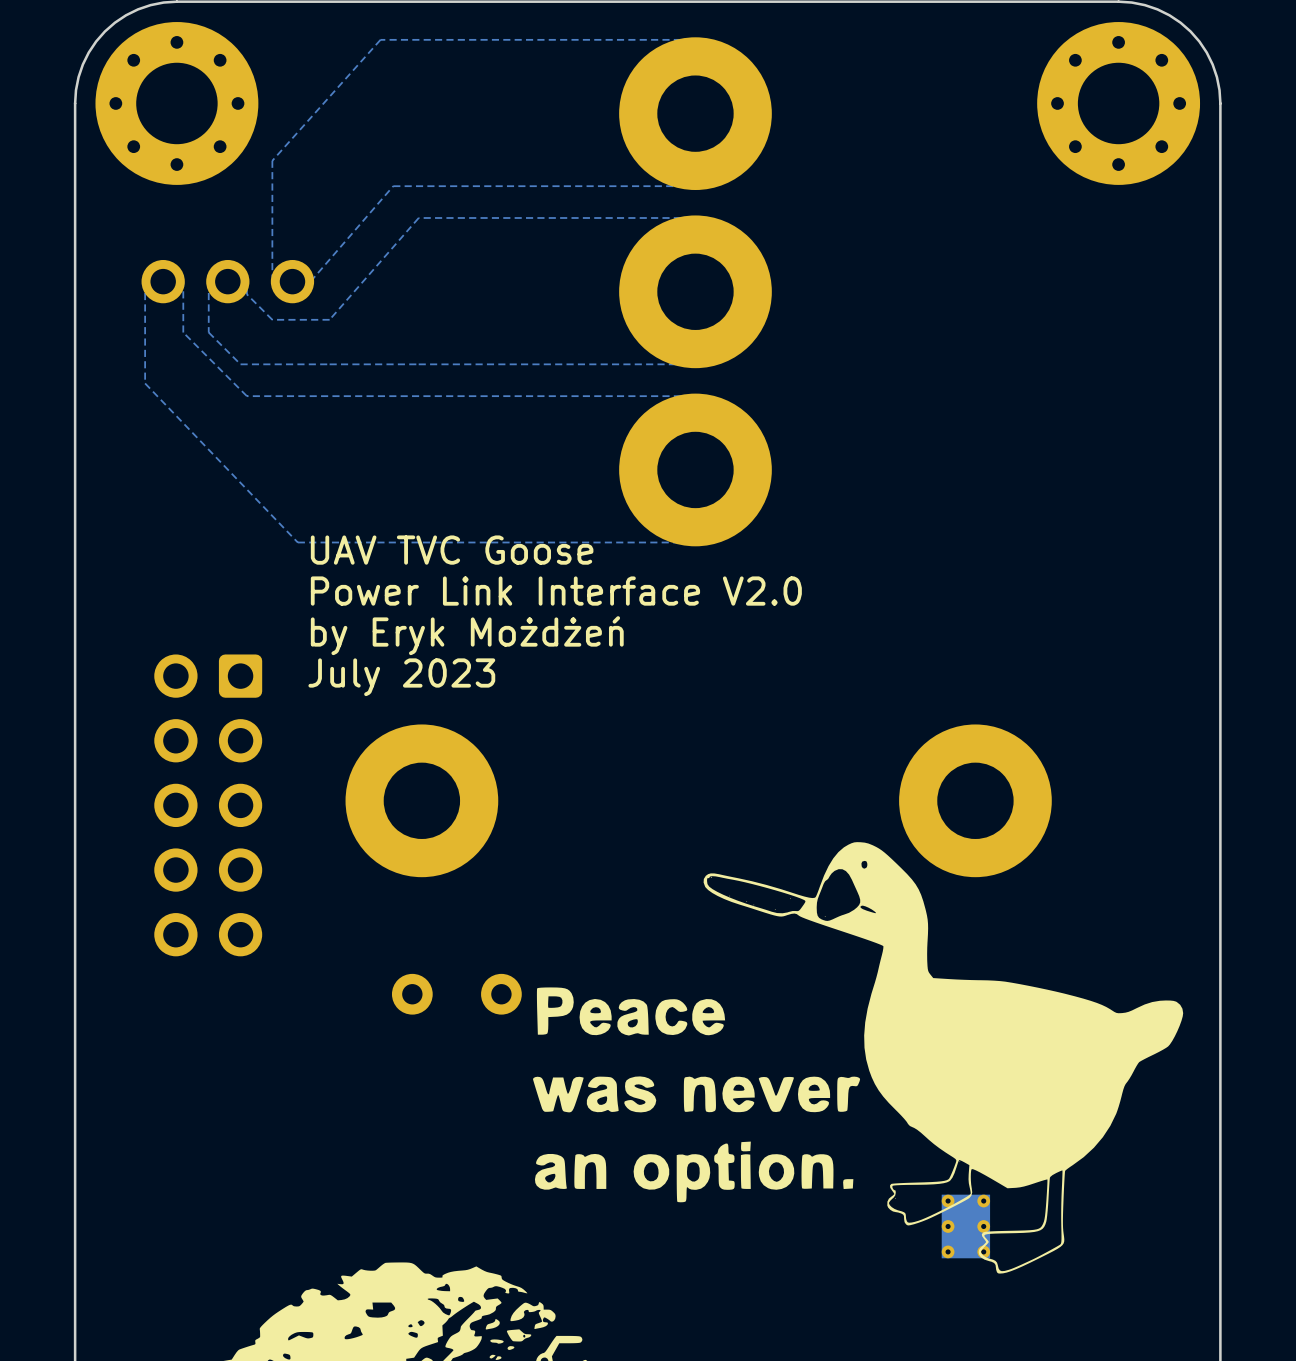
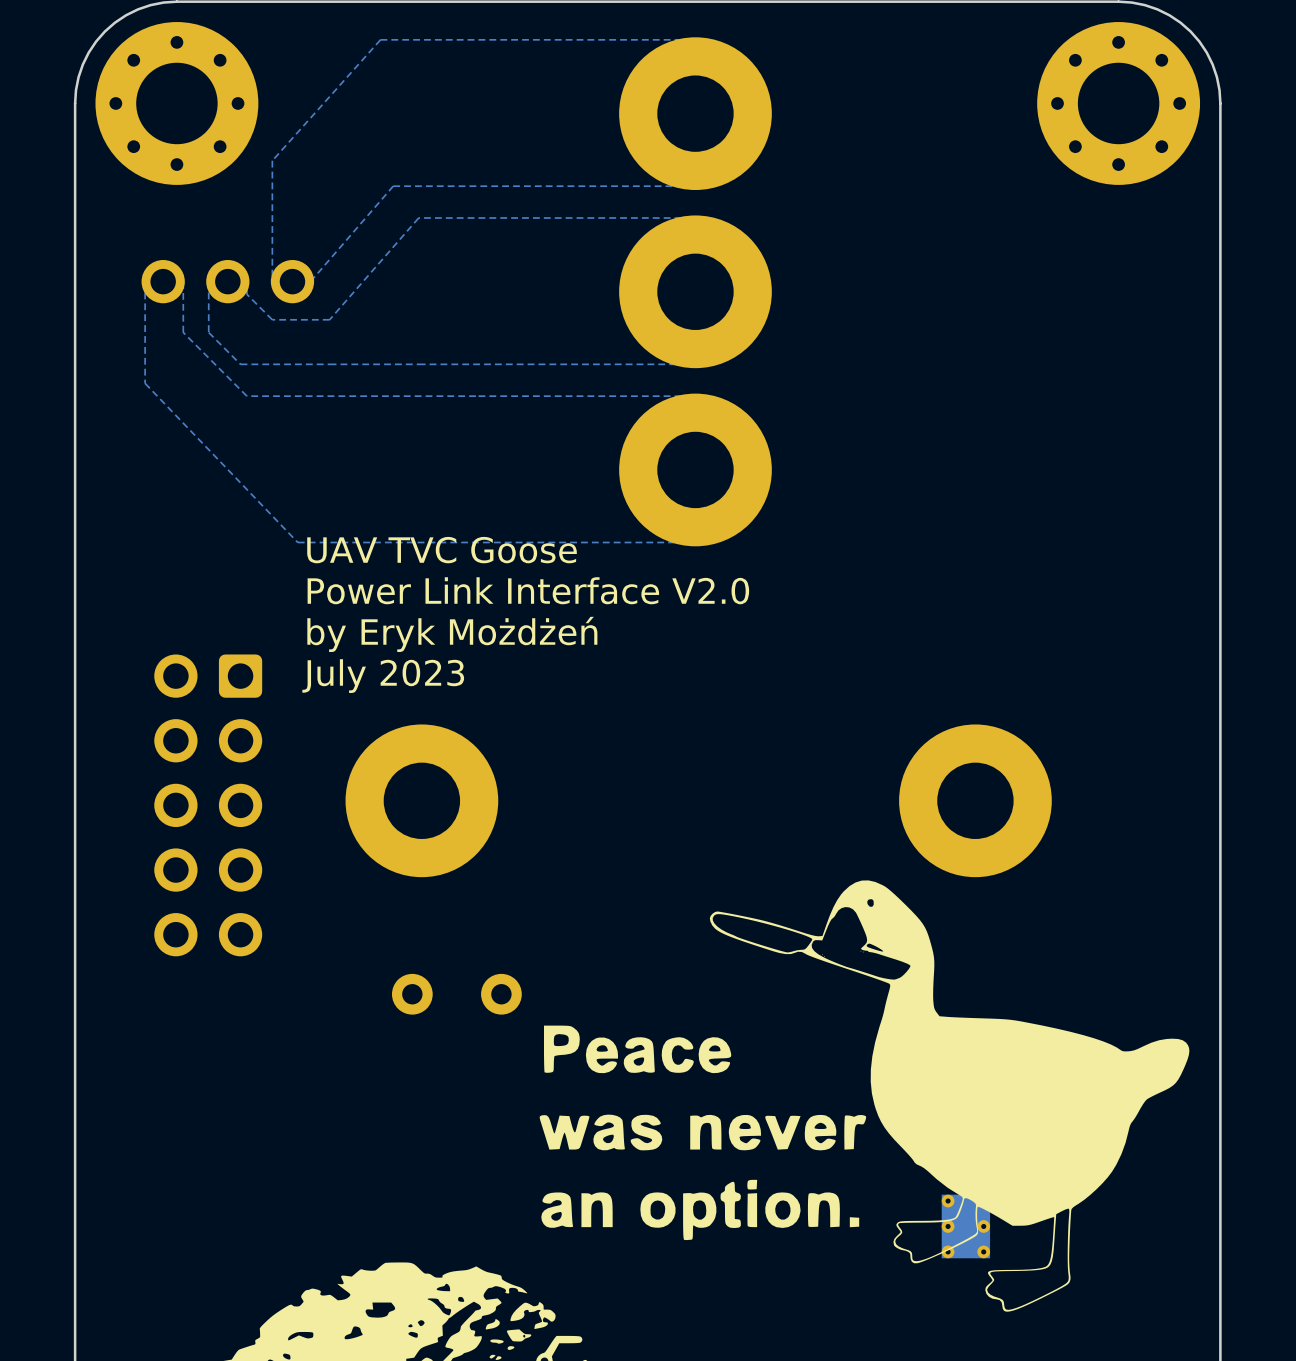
drawing: [533, 842, 1184, 1274] -> none
drawing: none -> [539, 880, 1190, 1312]

